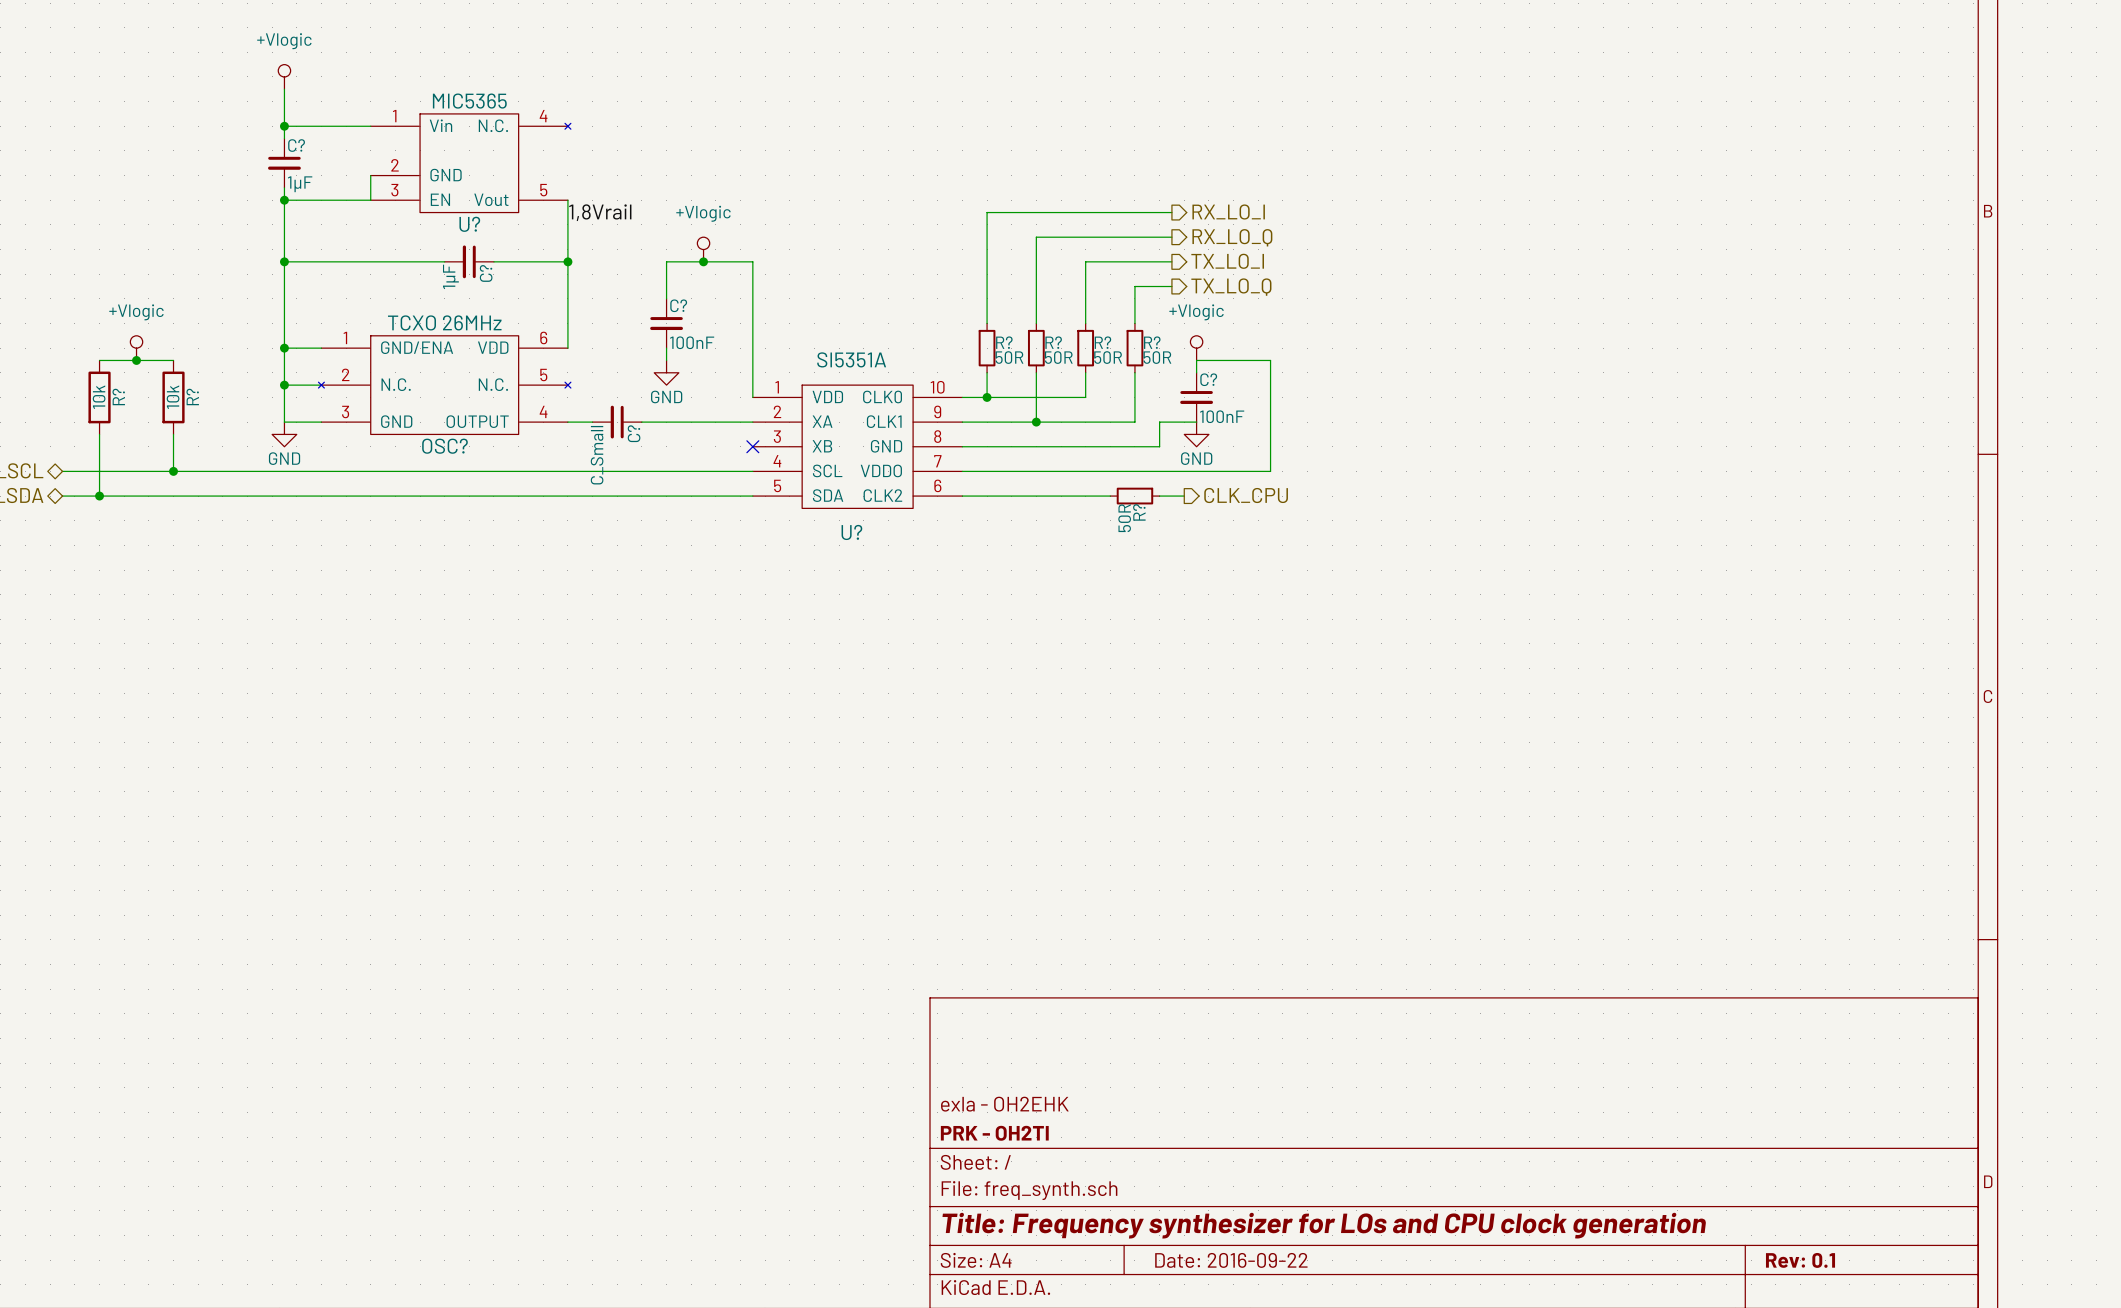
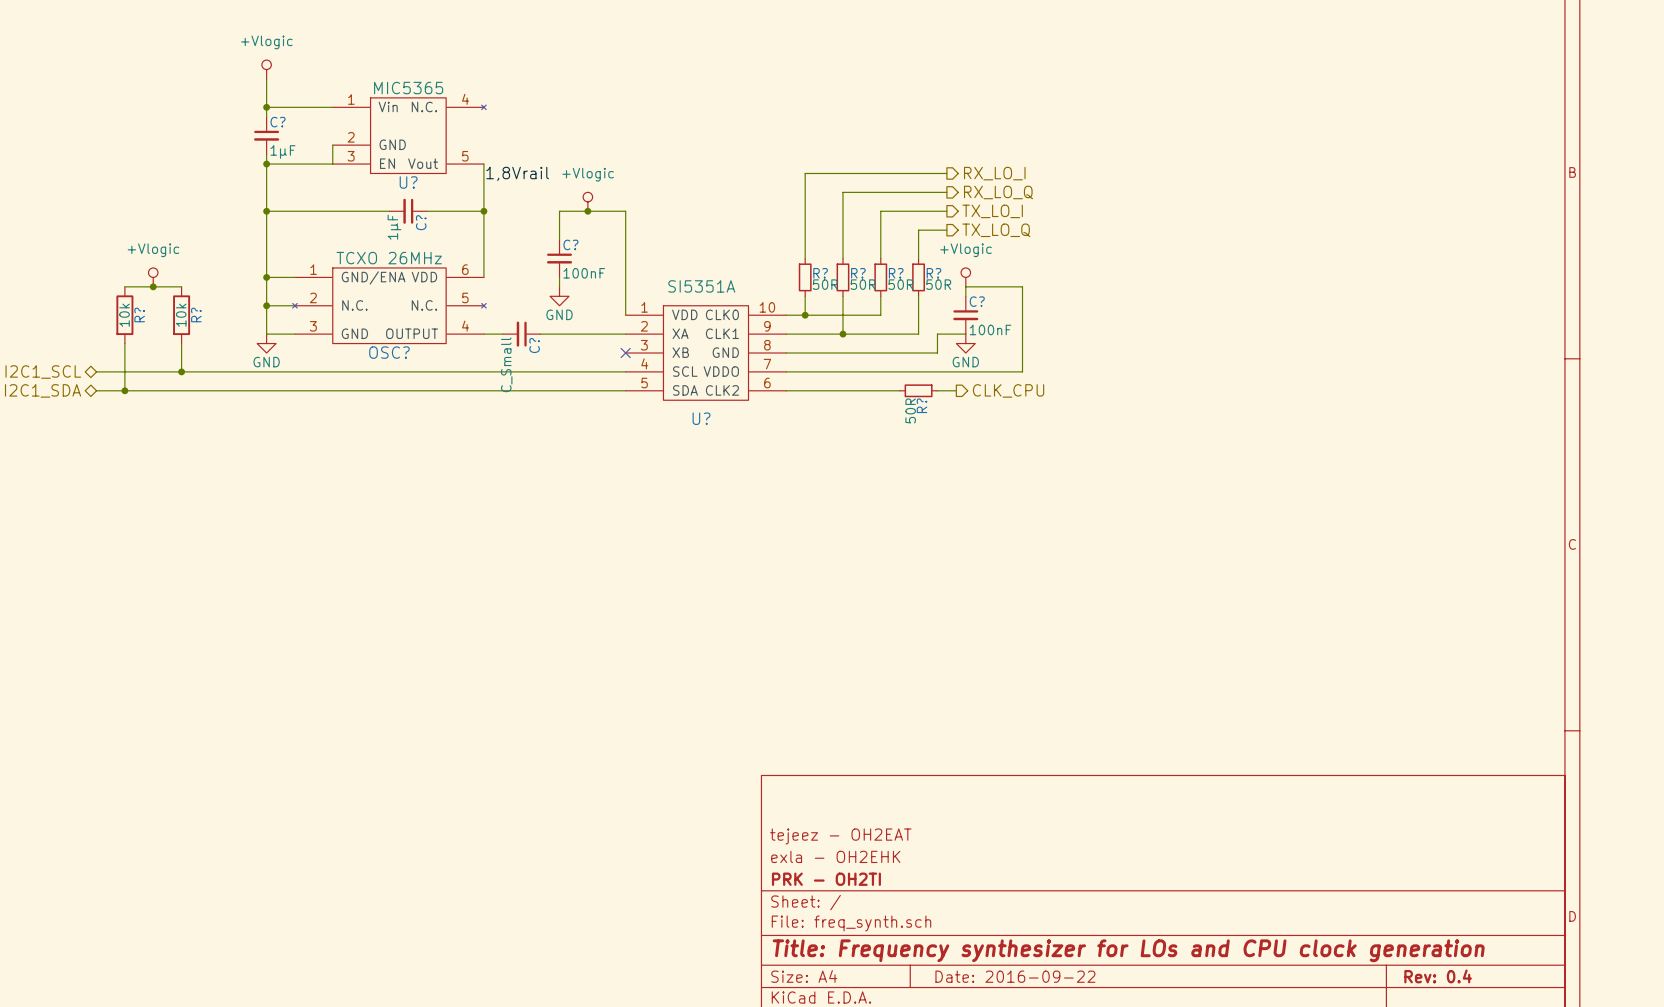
title block: none -> tejeez - OH2EAT (840, 836)
title block: Rev: 0.1 (1800, 1260) -> Rev: 0.4 (1438, 976)

